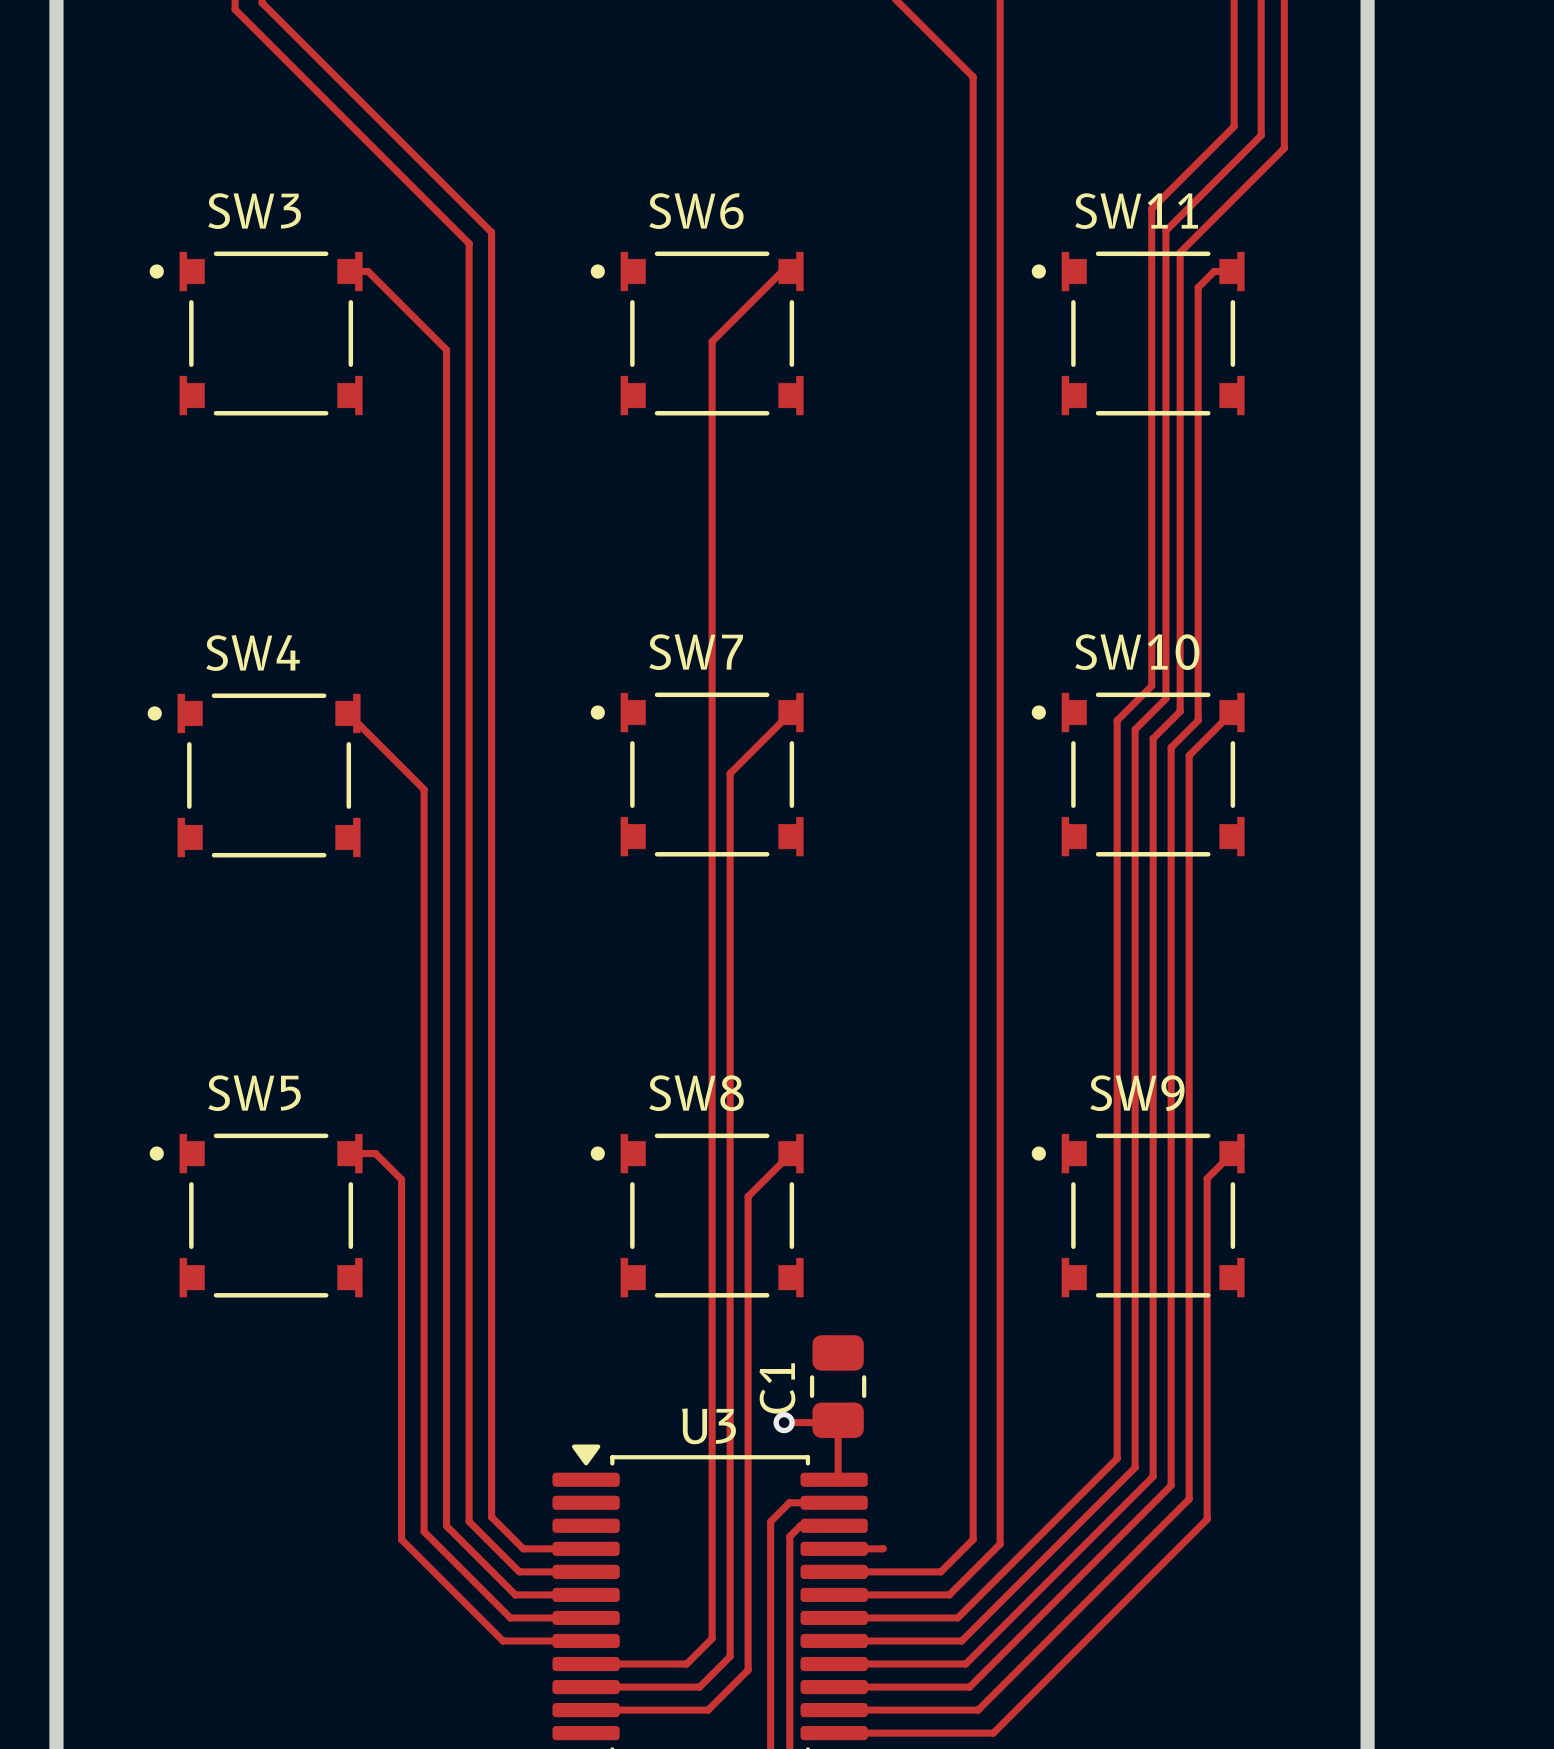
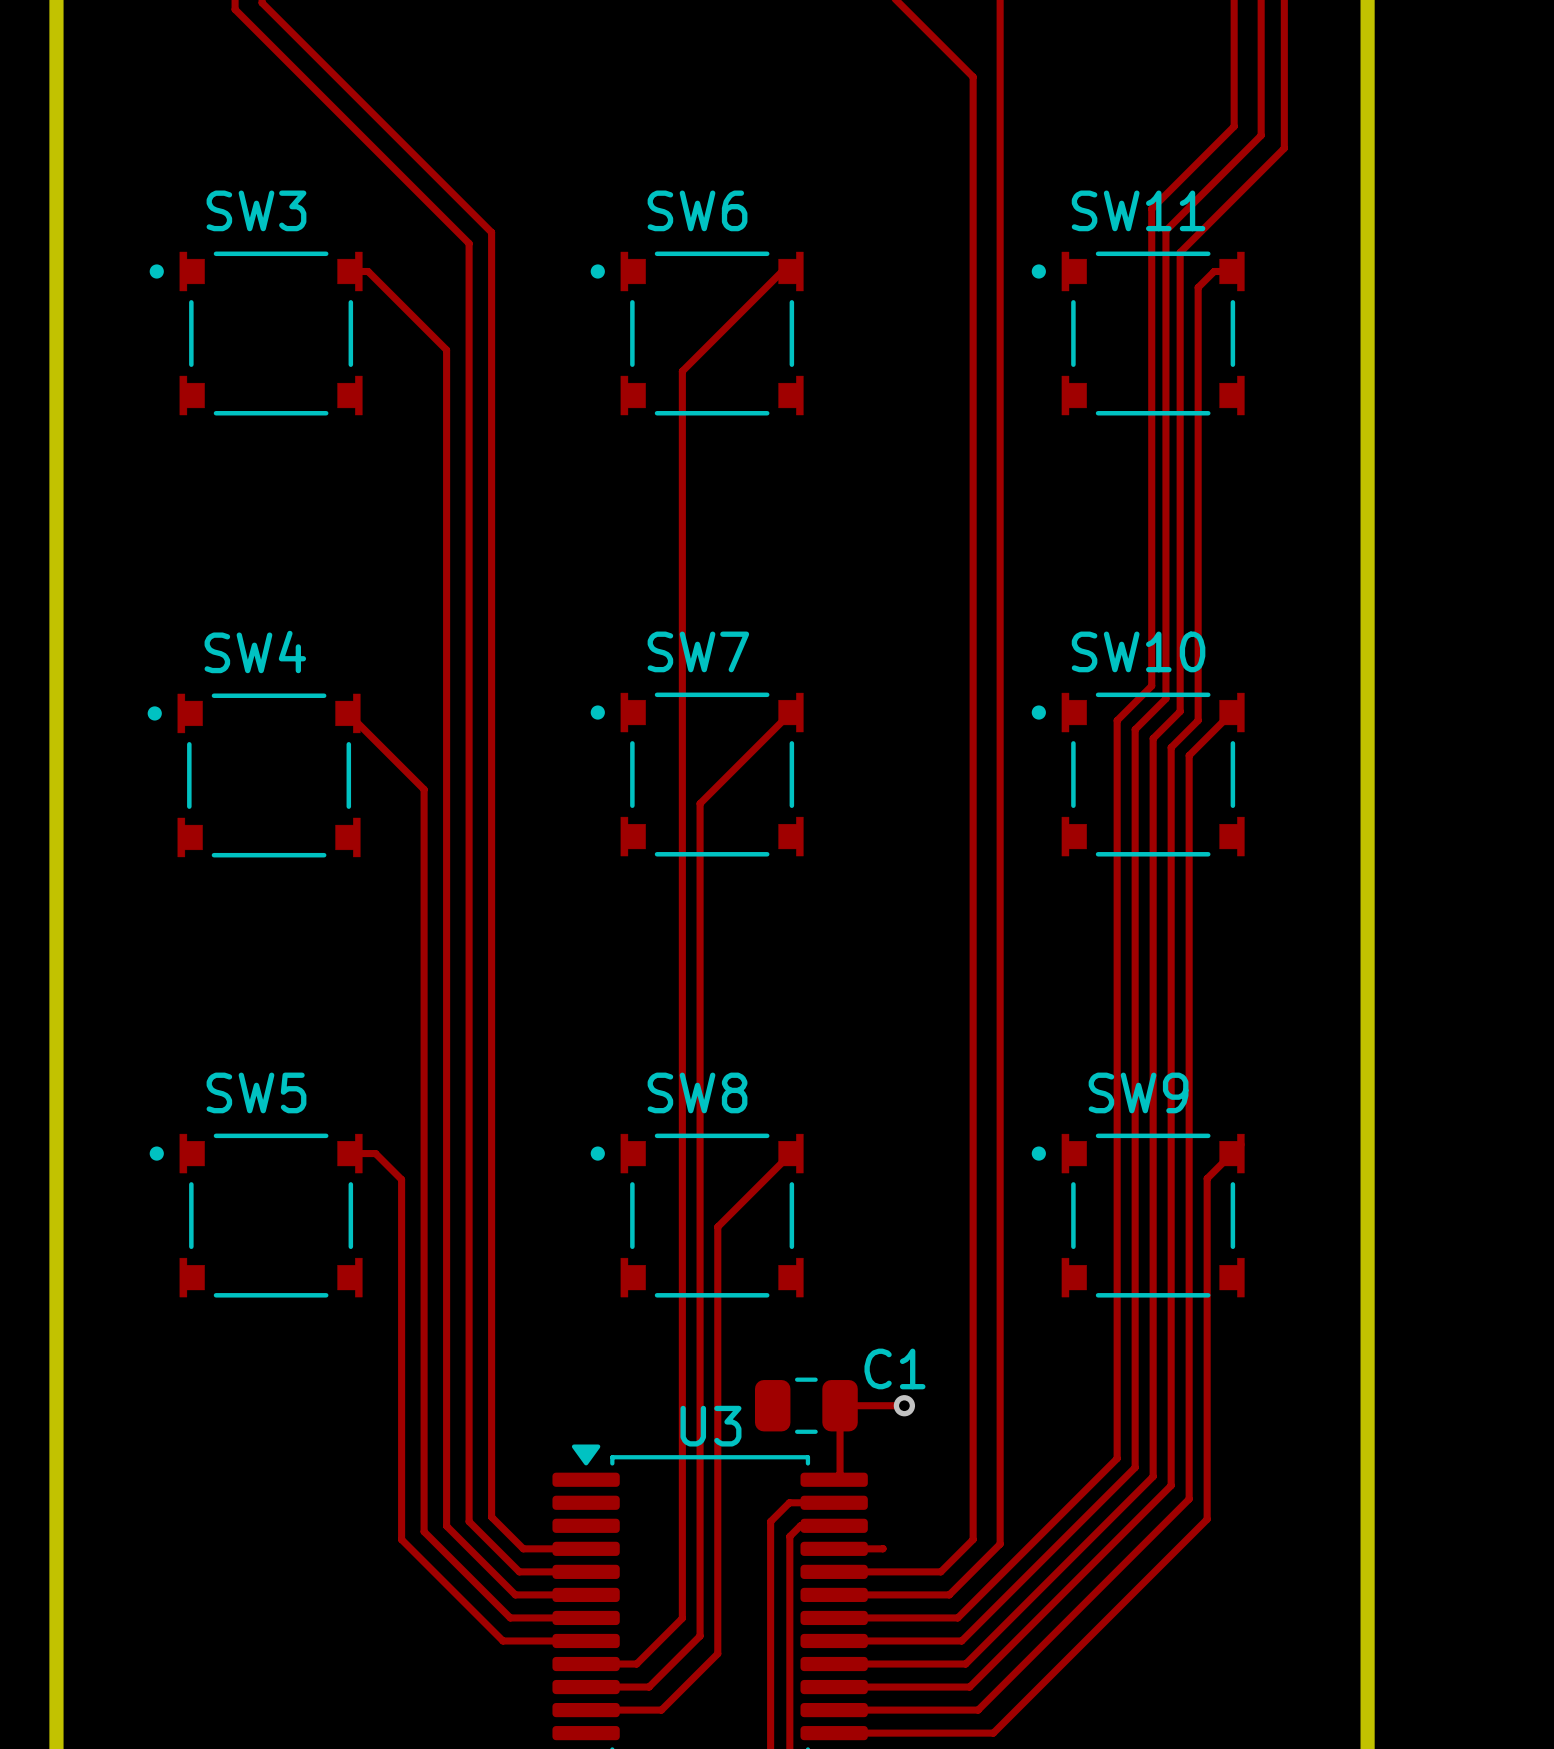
track: (712, 341) (712, 1638) (686, 1664) (636, 1664) -> (712, 341) (682, 371) (682, 1618) (636, 1664)
track: (730, 773) (730, 1656) (699, 1687) (649, 1687) -> (730, 773) (700, 803) (700, 1636) (649, 1687)
track: (748, 1196) (748, 1670) (708, 1710) (661, 1710) -> (748, 1196) (717, 1226) (717, 1653) (661, 1710)
C1 side: bottom (838, 1386) -> top (806, 1405)
track: none -> (857, 1405) (904, 1405)
track: (784, 1422) (835, 1422) (838, 1420) (838, 1475) -> (840, 1405) (840, 1473) (838, 1475)
via position: (784, 1422) -> (904, 1405)

